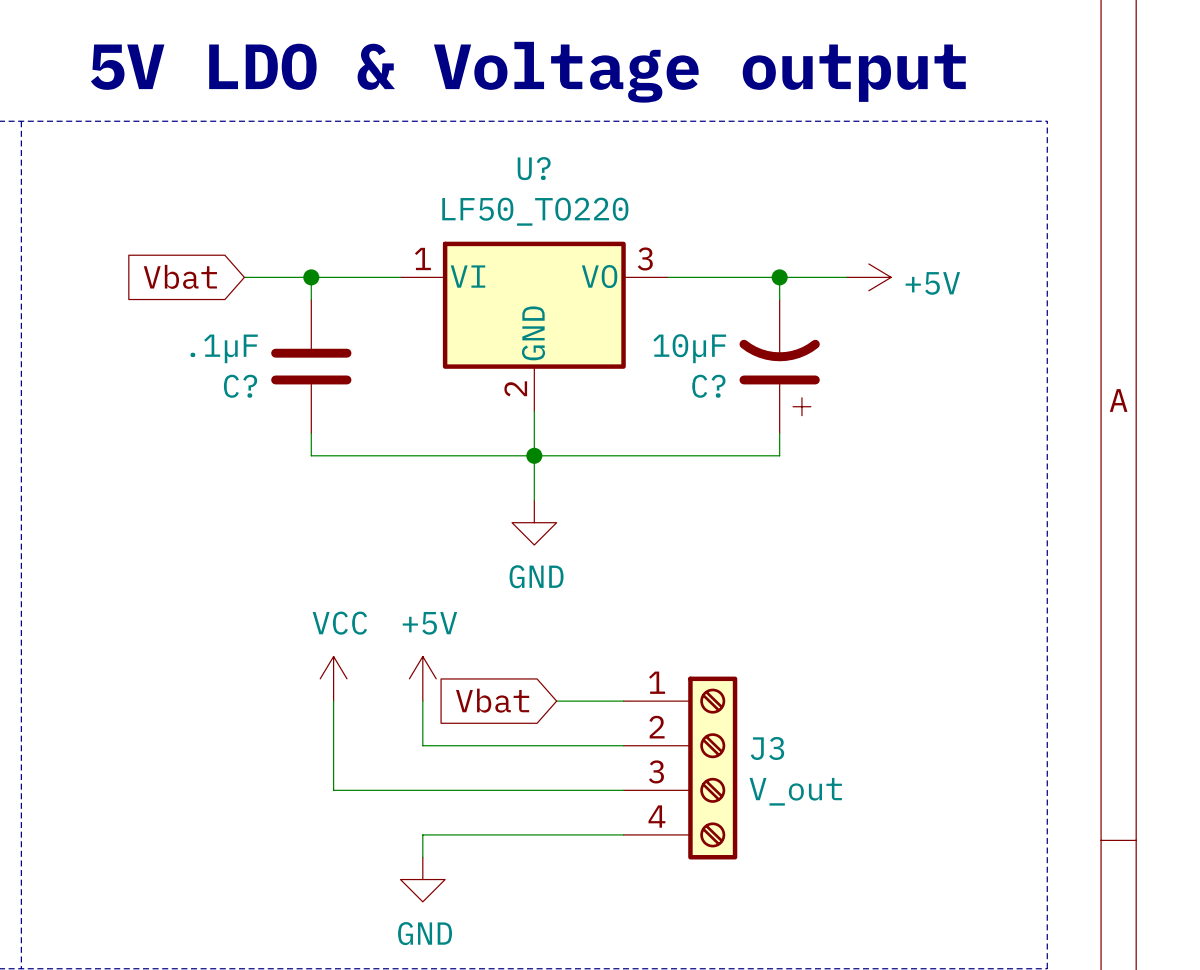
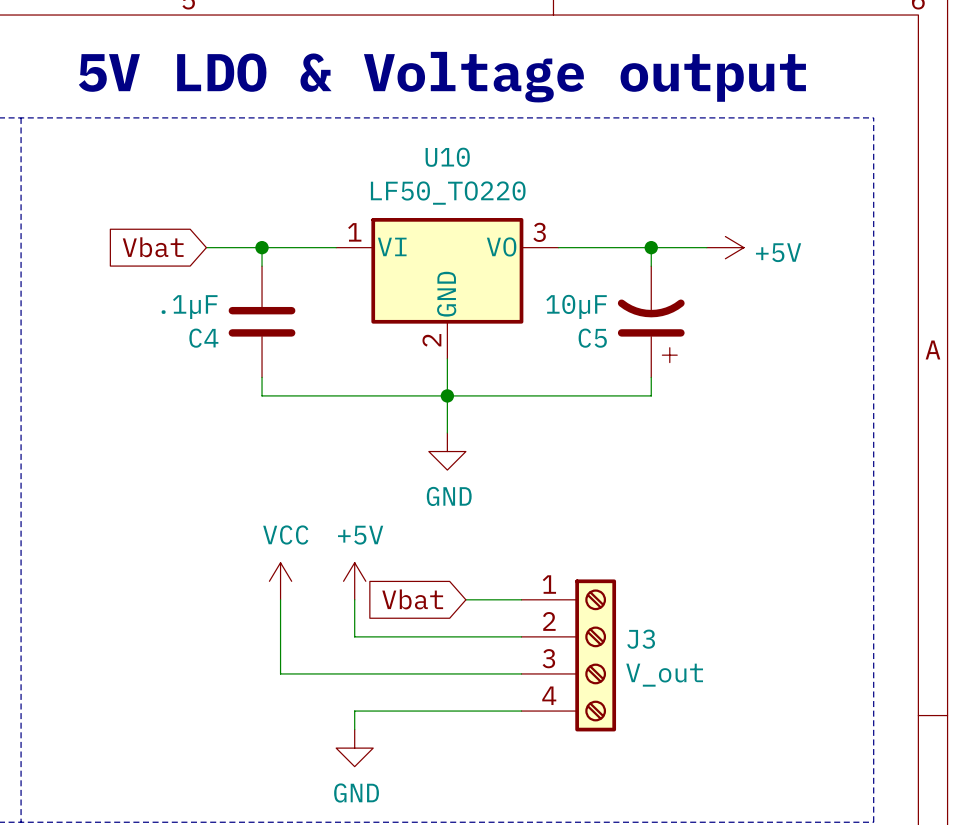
U? name: U? (534, 168) -> U10 (447, 157)
C? name: C? (240, 386) -> C4 (203, 338)
C? name: C? (708, 386) -> C5 (592, 338)

